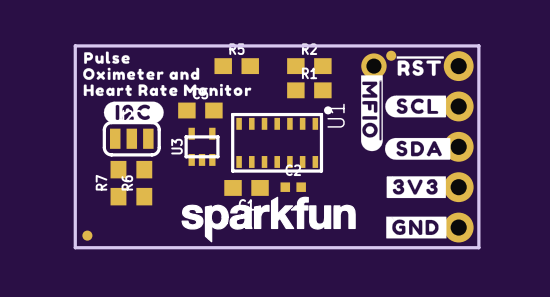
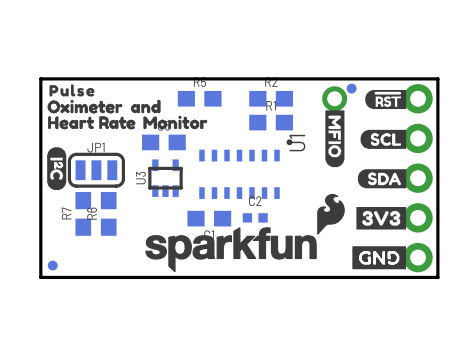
drawing shape: [396, 56, 444, 76] -> [365, 89, 407, 110]
drawing: none -> [47, 99, 208, 191]
drawing: [83, 67, 252, 124] -> none
drawing shape: [361, 75, 383, 152] -> [325, 110, 345, 168]
drawing shape: [385, 95, 447, 118] -> [360, 129, 407, 149]
U1 footprint: [231, 106, 333, 173] -> [199, 139, 293, 199]
drawing shape: [385, 137, 451, 160] -> [357, 169, 407, 189]
part: (131, 138) -> none
JP1: none -> (96, 170)
drawing: none -> [317, 193, 406, 270]
drawing shape: [386, 176, 446, 199] -> [356, 207, 407, 230]
drawing: [386, 216, 447, 239] -> none

